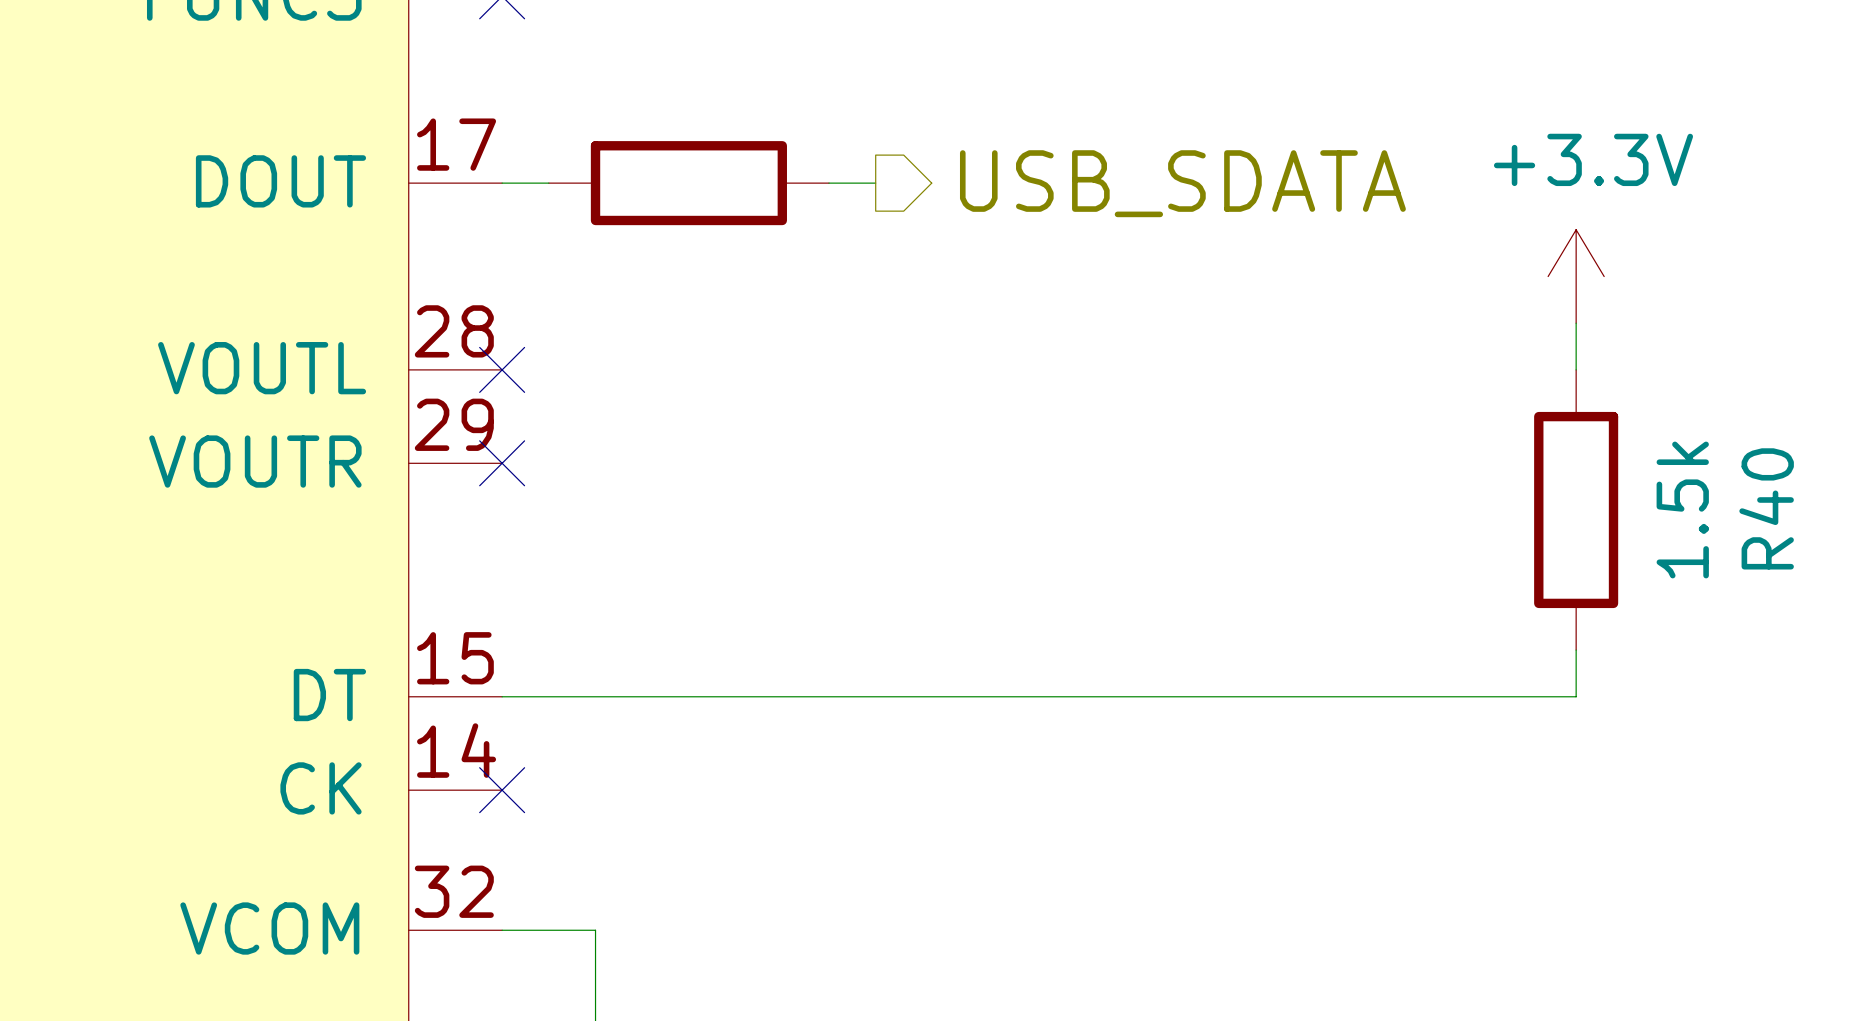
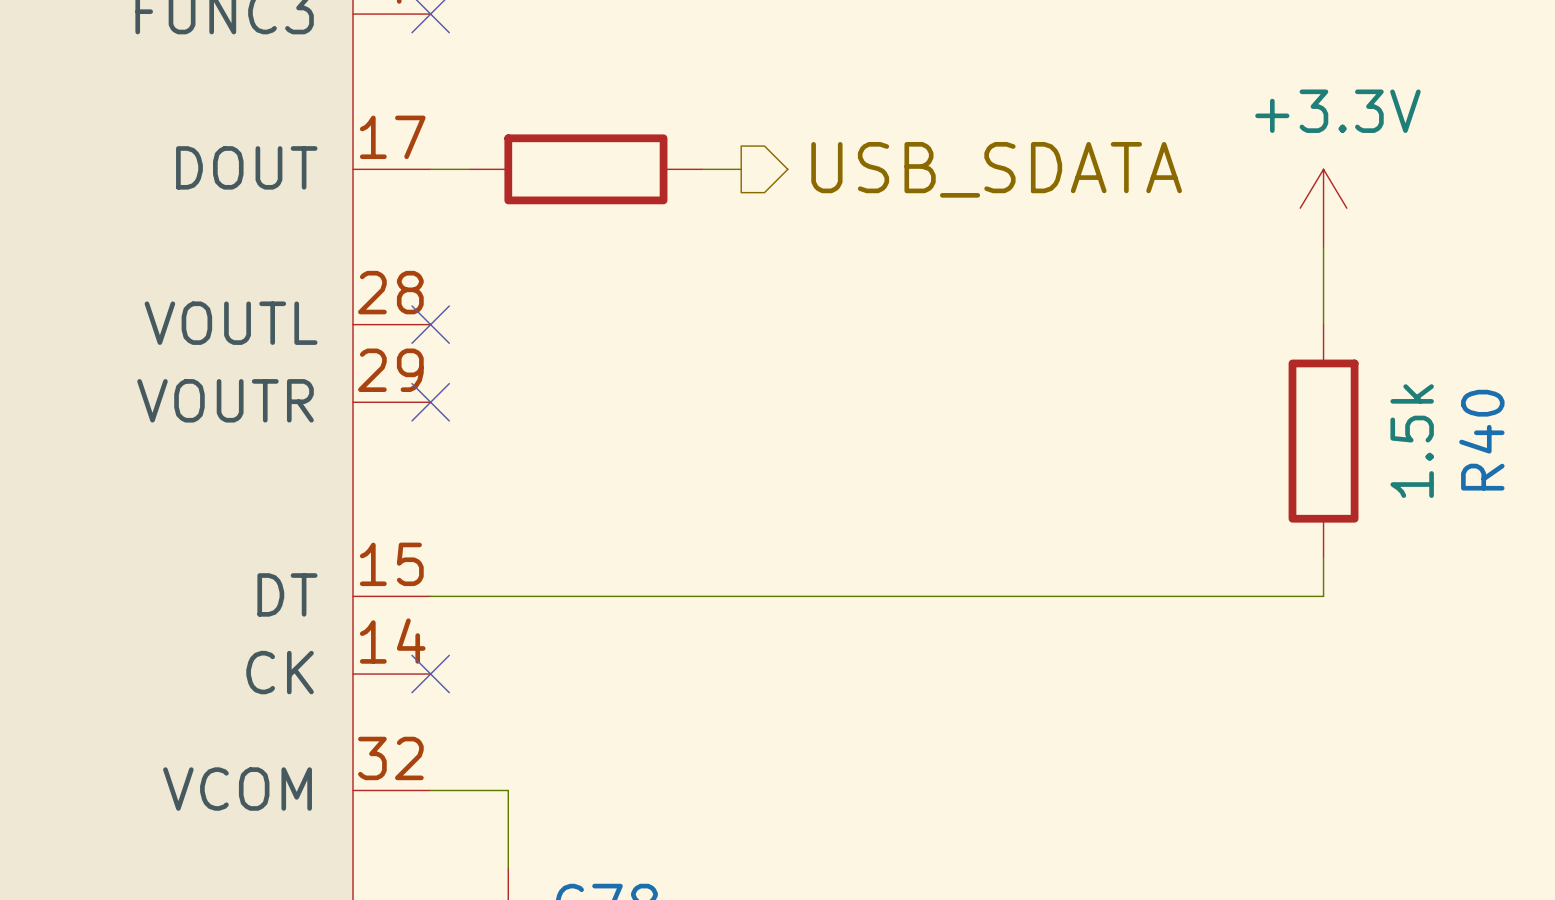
power symbol position: +3.3V (1576, 276) -> +3.3V (1323, 208)

